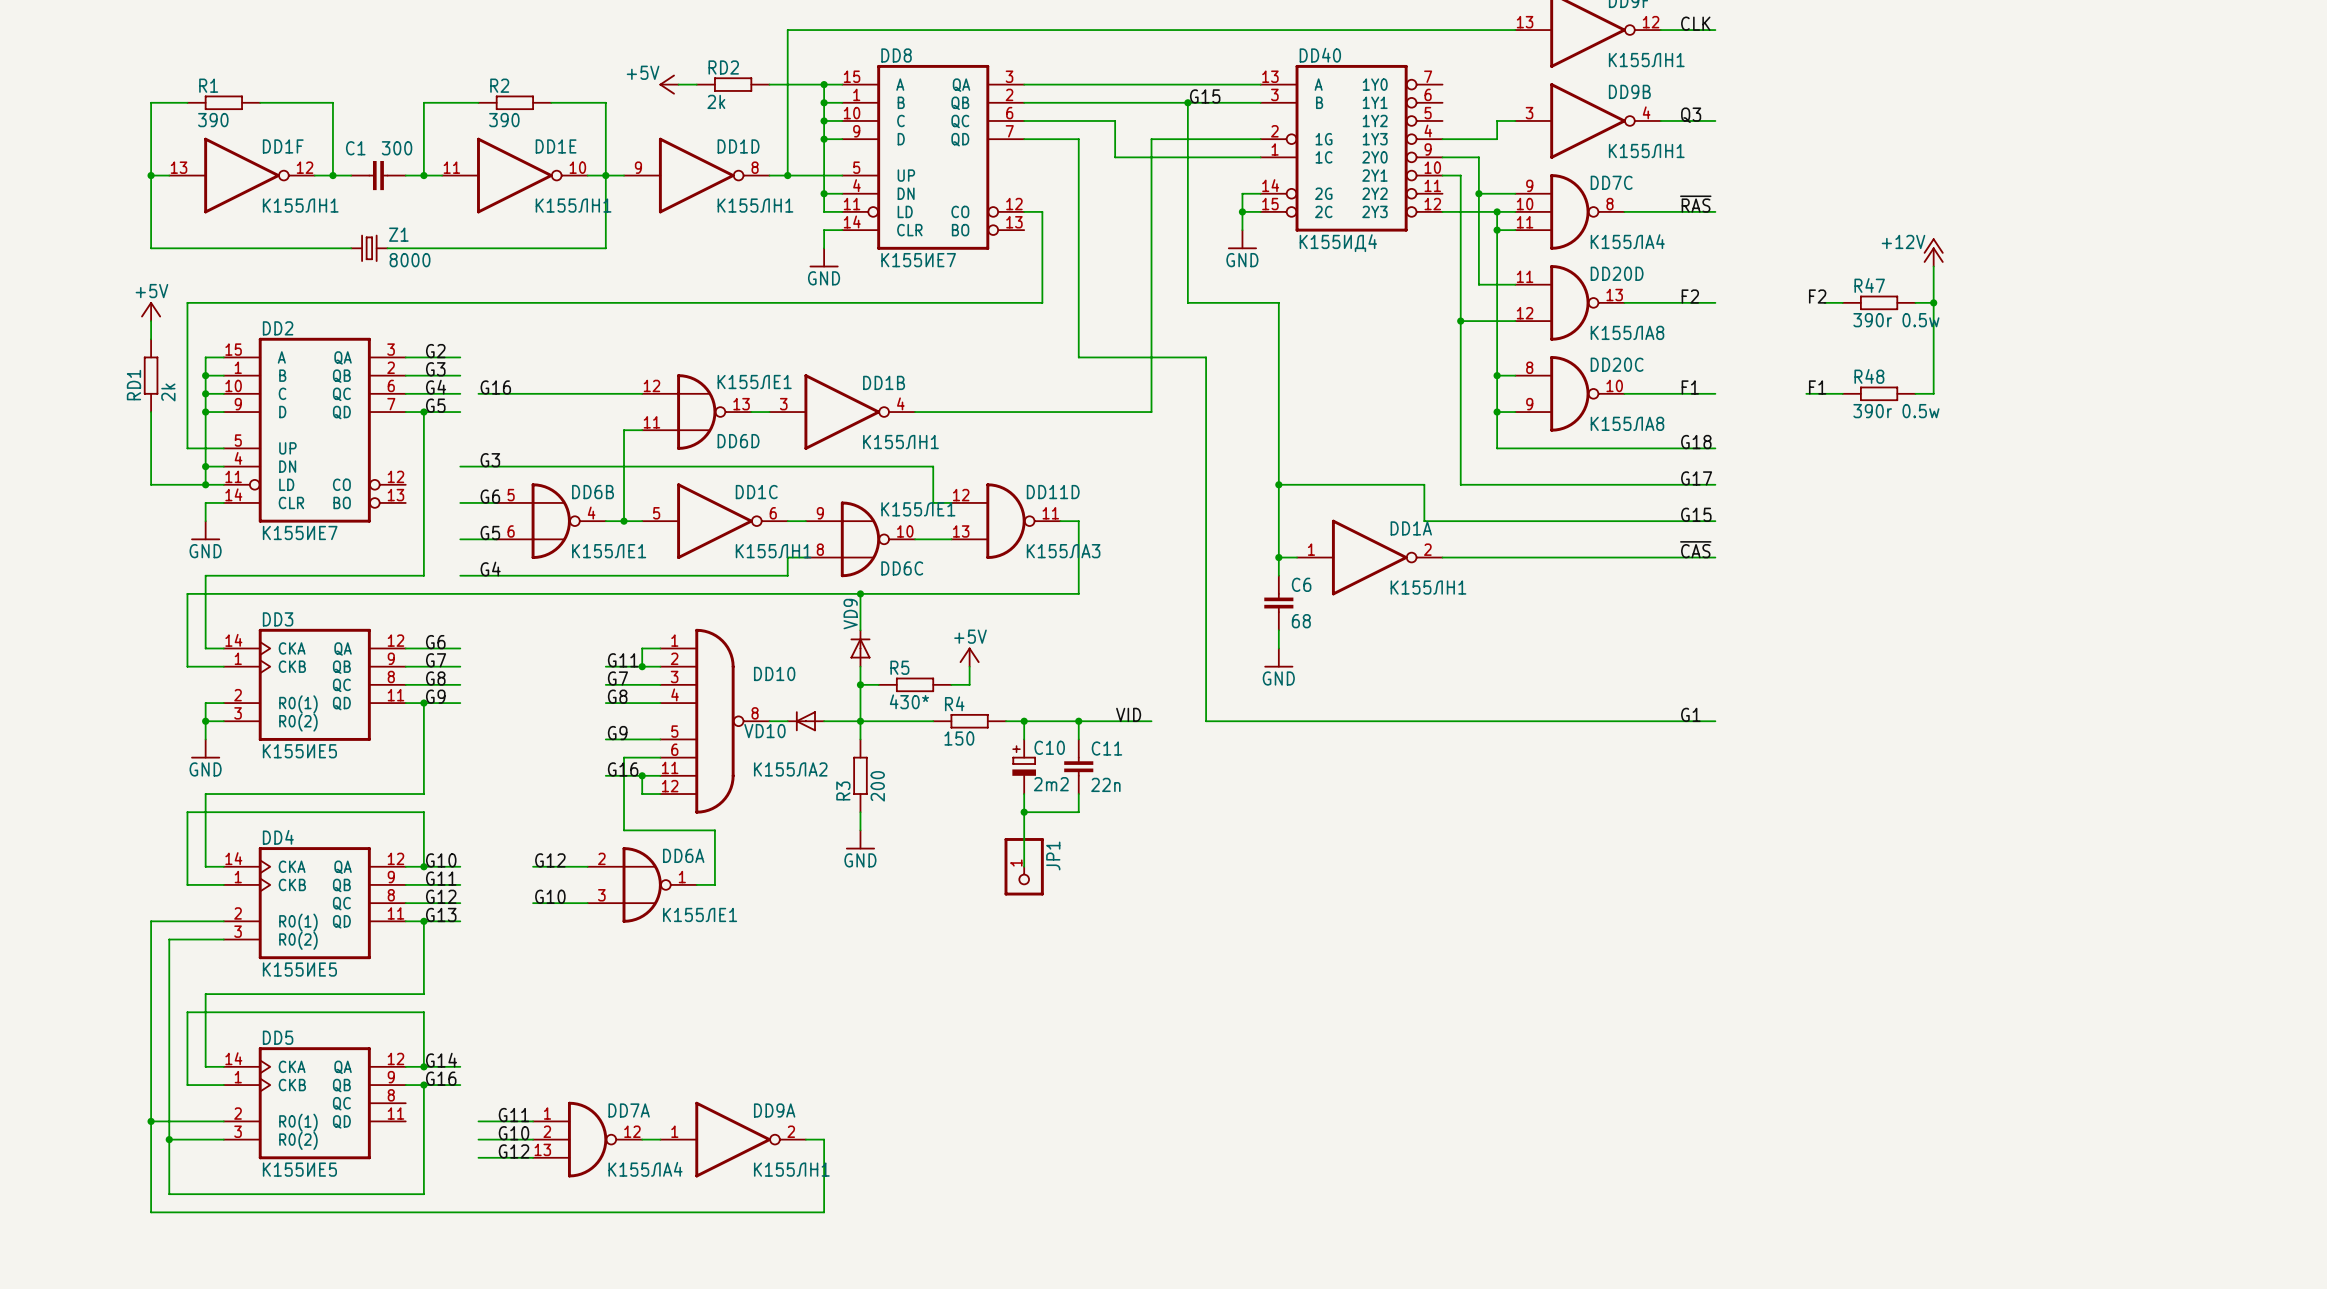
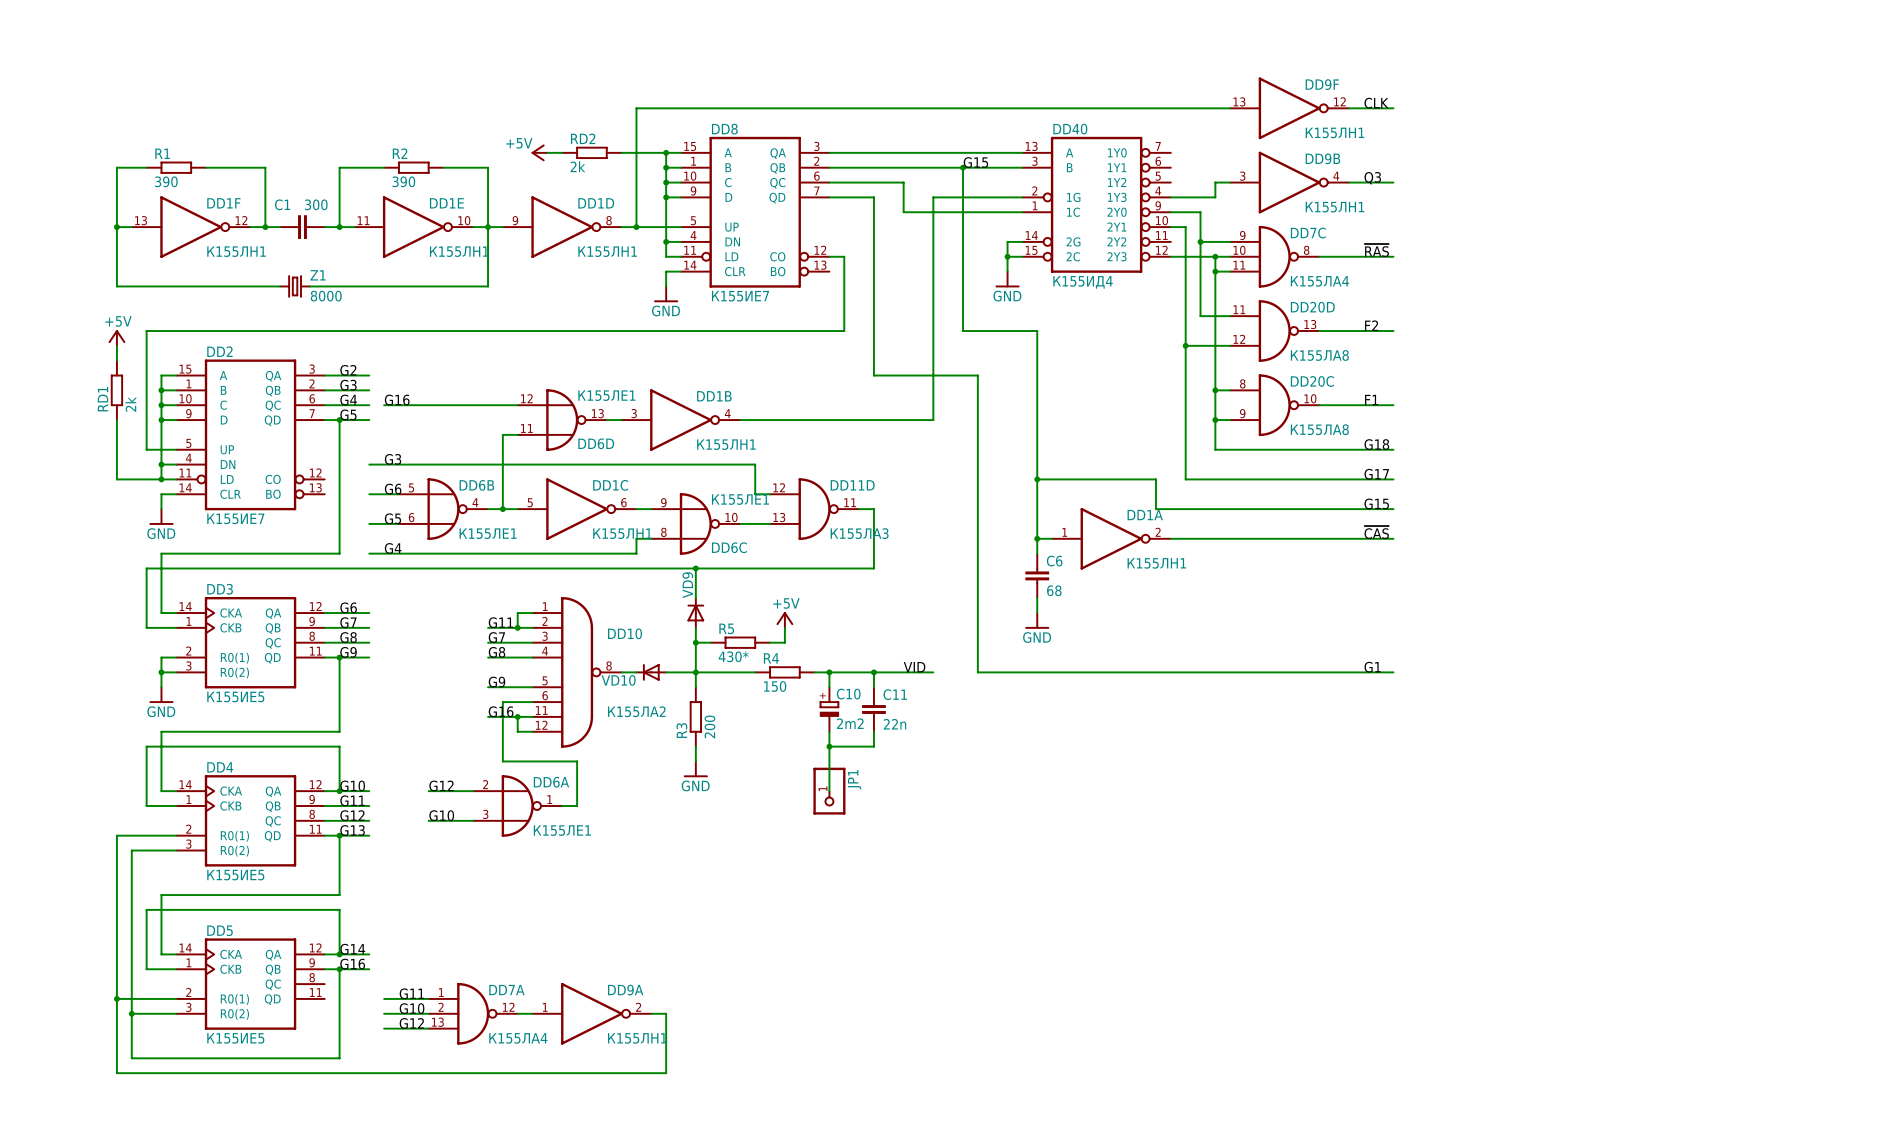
power symbol: +12V (1933, 252) -> none
wire: (1933, 266) (1933, 393) (1915, 393) -> none
label: F2 (1817, 296) -> none
wire: (1824, 302) (1842, 302) -> none
R47: 390r 0.5w (1879, 302) -> none
wire: (1915, 302) (1933, 302) -> none
junction: (1933, 302) -> none
label: F1 (1817, 387) -> none
wire: (1806, 393) (1842, 393) -> none
R48: 390r 0.5w (1879, 393) -> none

